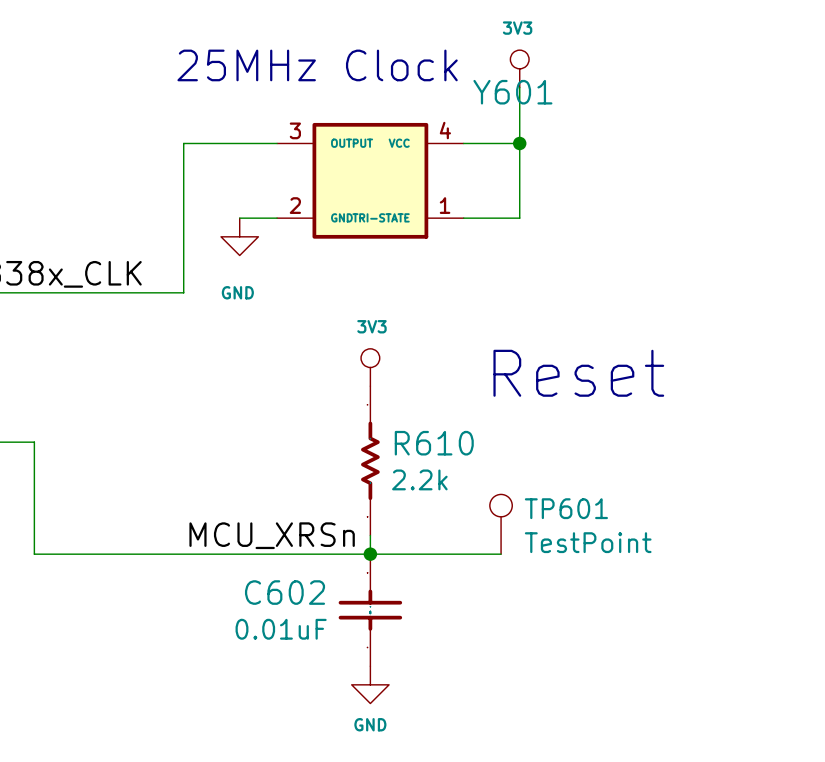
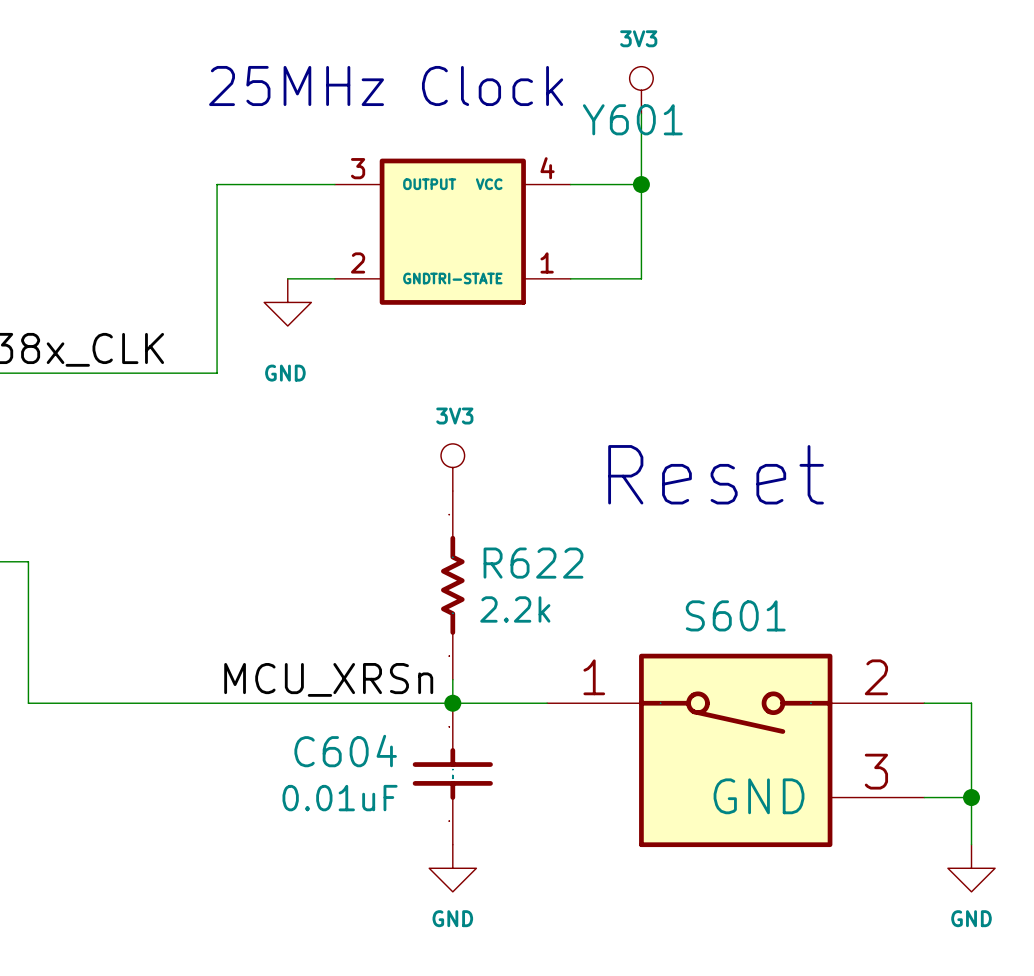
R610 name: R610 (434, 443) -> R622 (533, 563)
TP601: TestPoint (501, 524) -> none
wire: none -> (924, 703) (971, 703) (971, 844)
S601: none -> (735, 750)
C602 name: C602 (285, 592) -> C604 (345, 751)
wire: none -> (924, 797) (971, 797)
junction: none -> (971, 797)
power symbol: none -> GND (971, 868)

